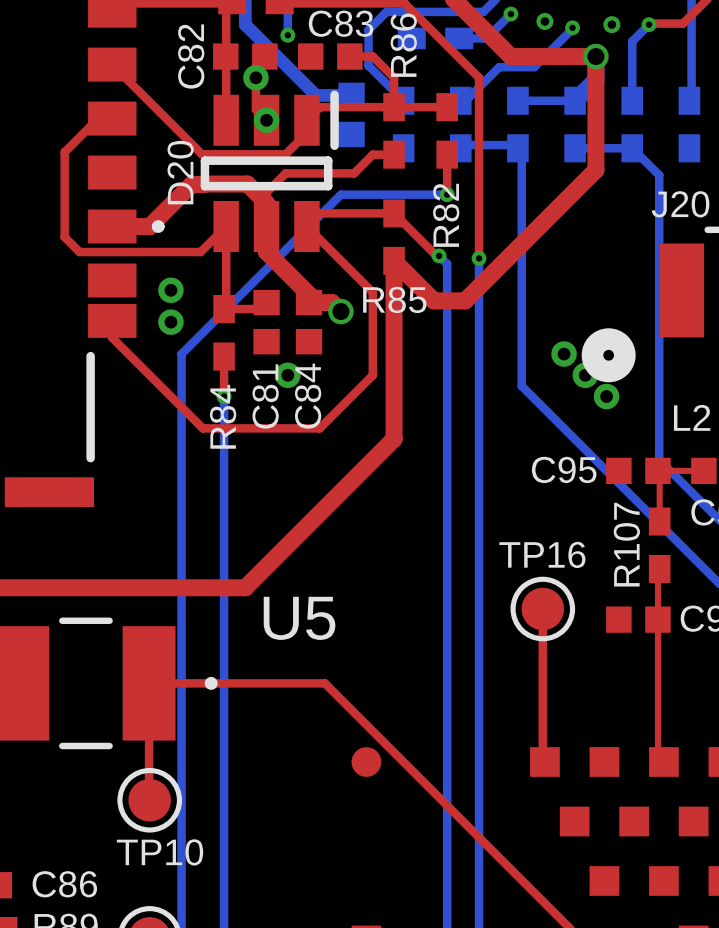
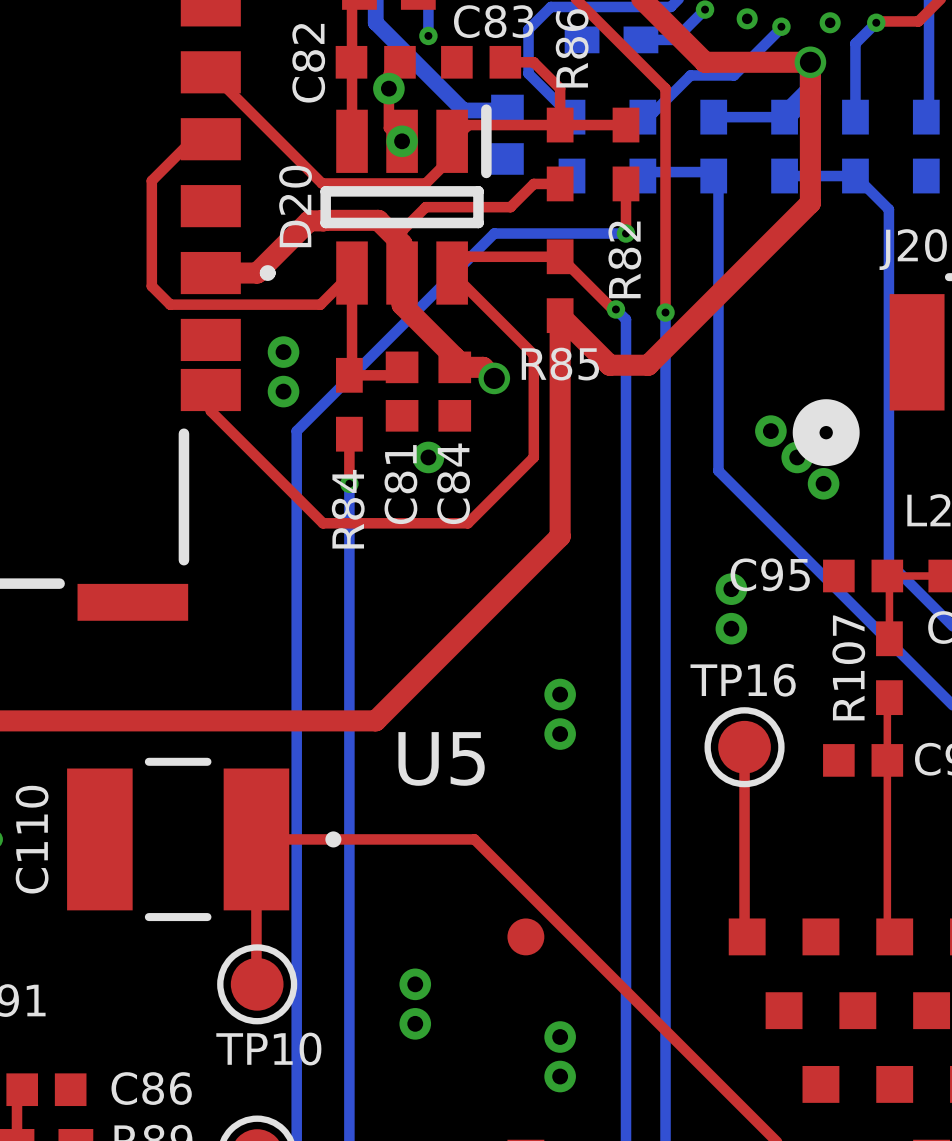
via: none -> (731, 589)
via: none -> (731, 628)
via: none -> (560, 694)
via: none -> (560, 734)
via: none -> (415, 984)
via: none -> (415, 1023)
via: none -> (560, 1037)
via: none -> (560, 1076)

